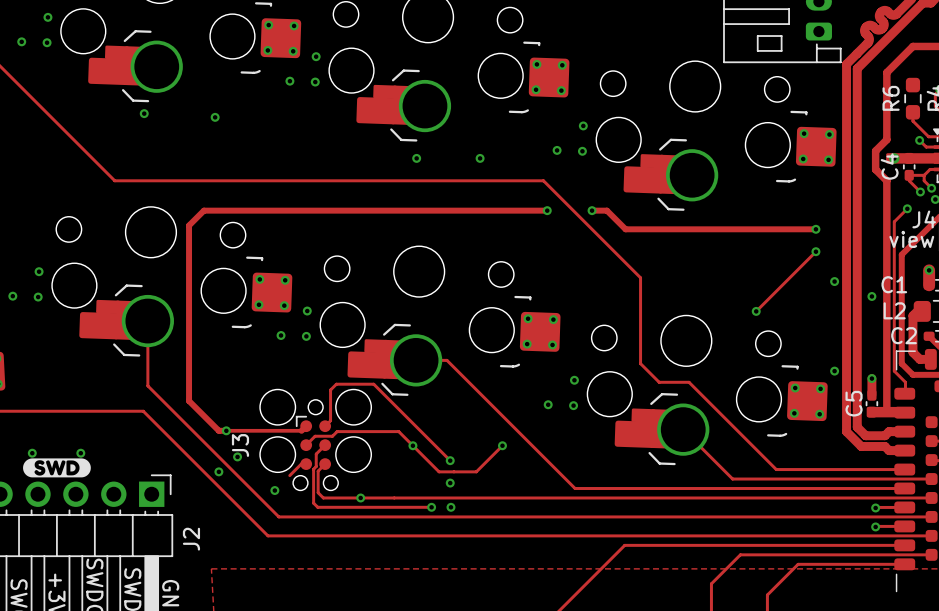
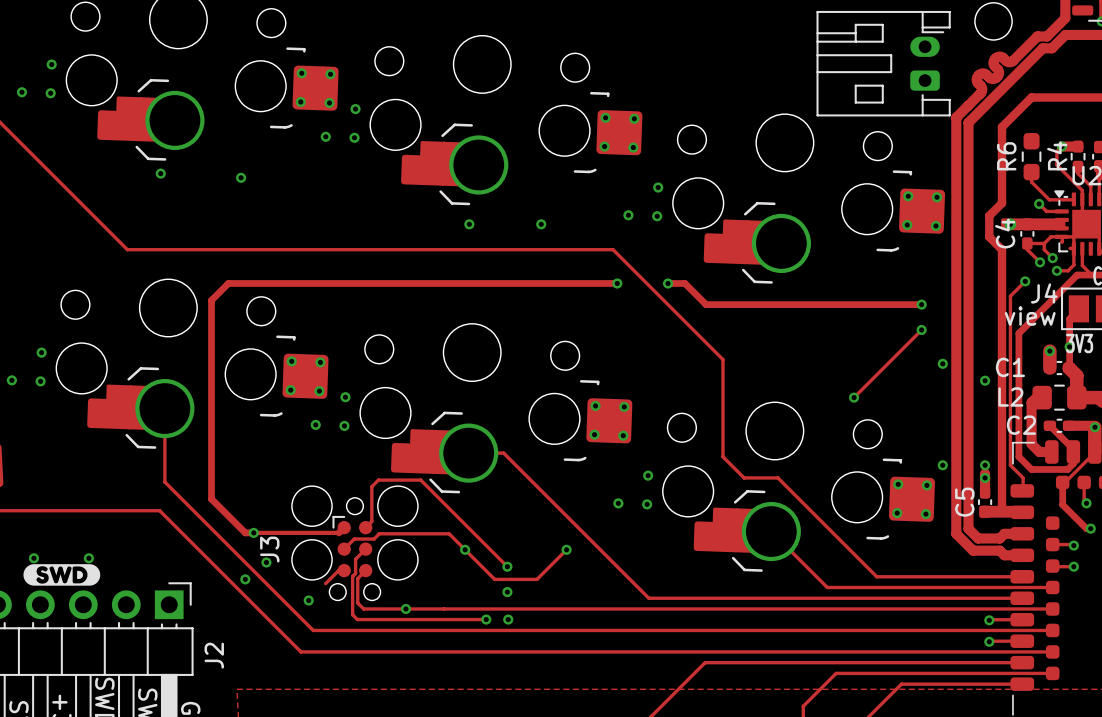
via: none -> (985, 465)
via: (871, 378) -> none
via: none -> (985, 477)

